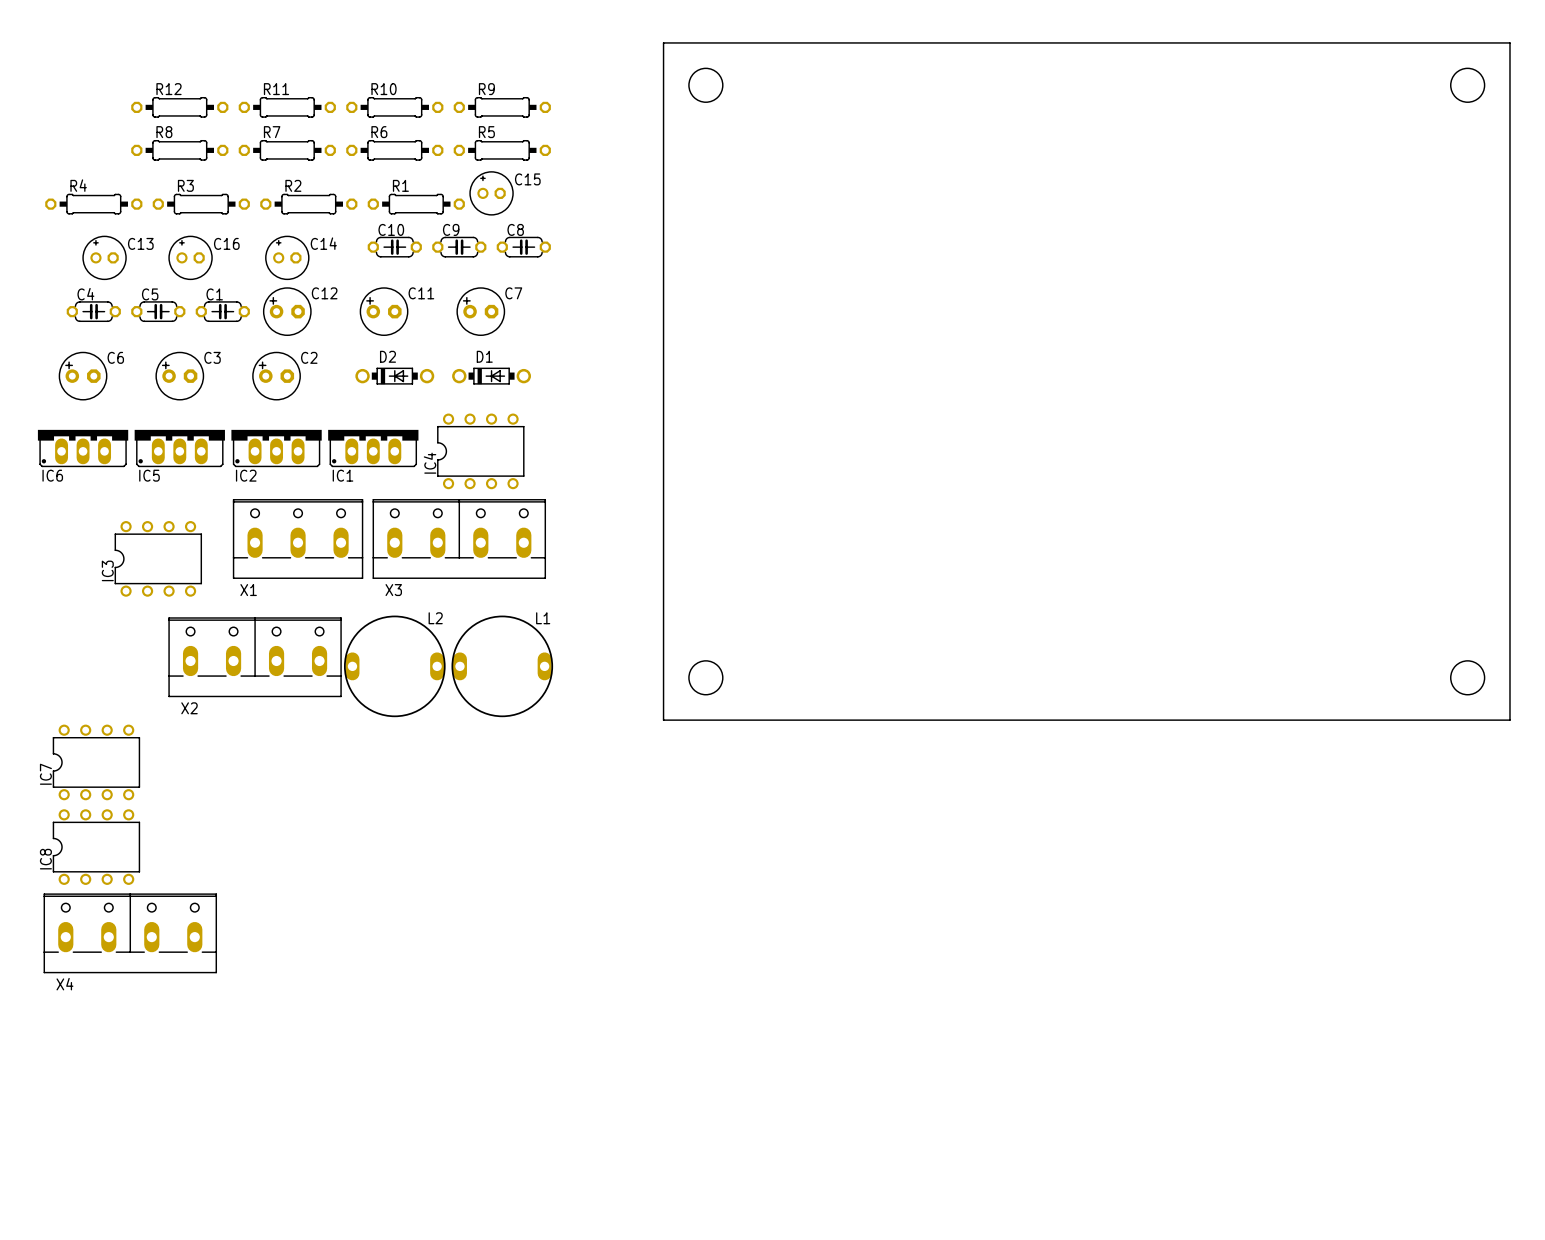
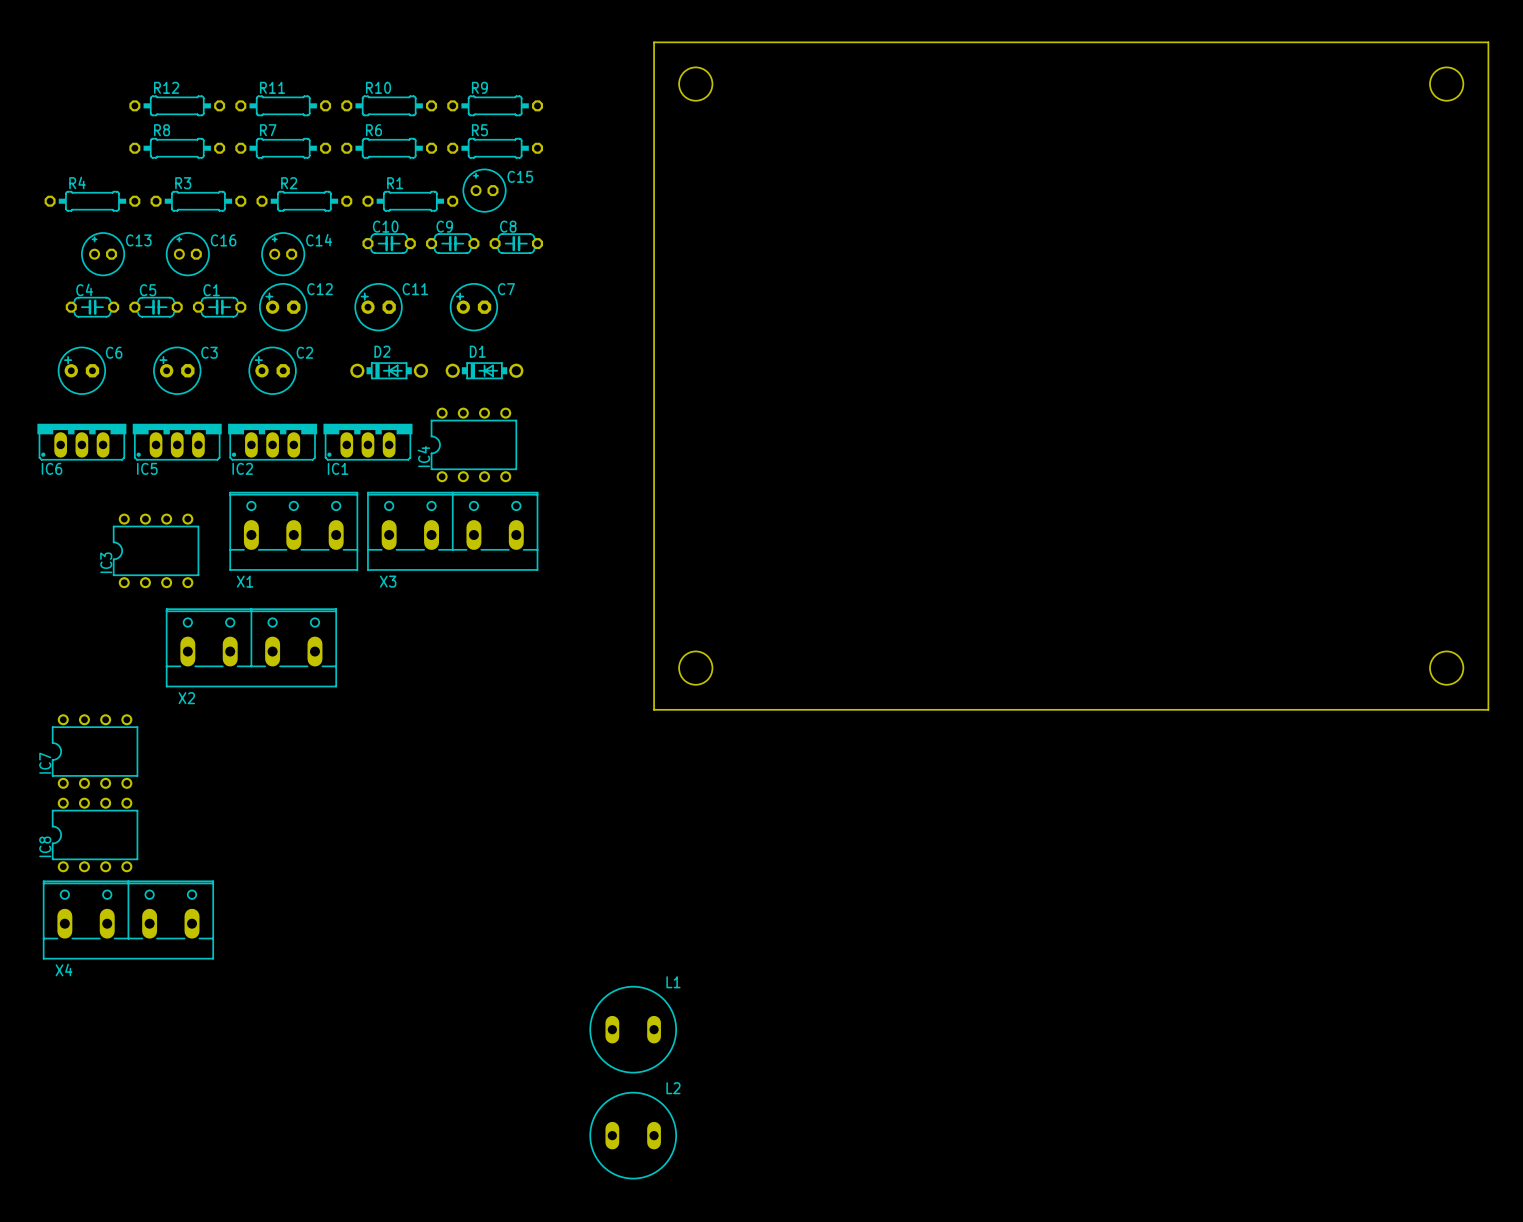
L2 footprint: [344, 615, 446, 718] -> [589, 1091, 678, 1180]
L1 footprint: [451, 615, 554, 718] -> [589, 985, 678, 1074]

